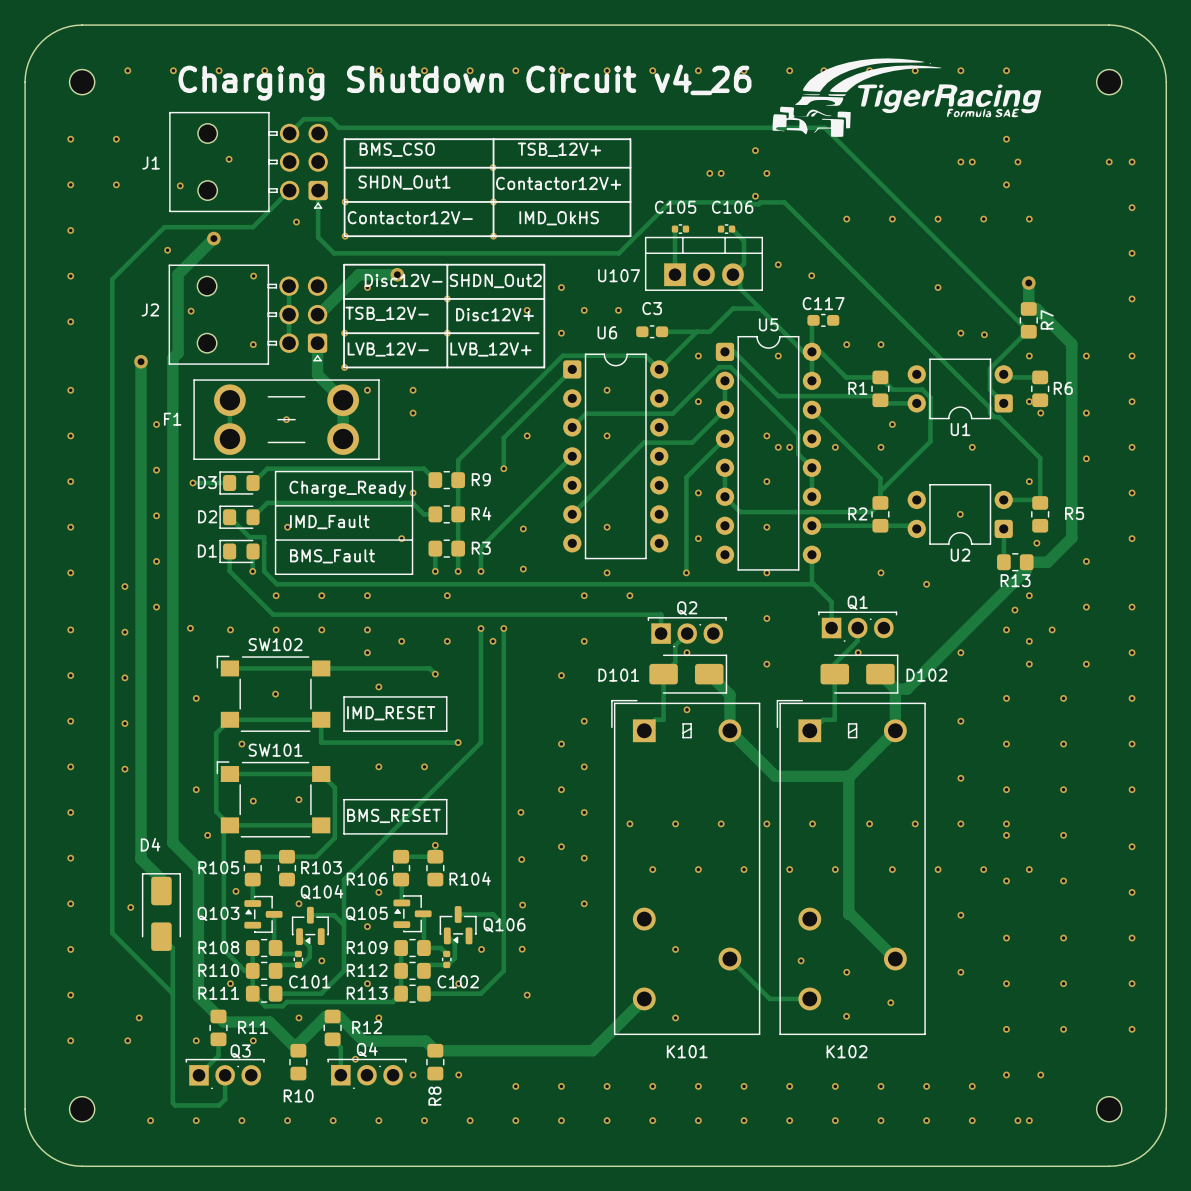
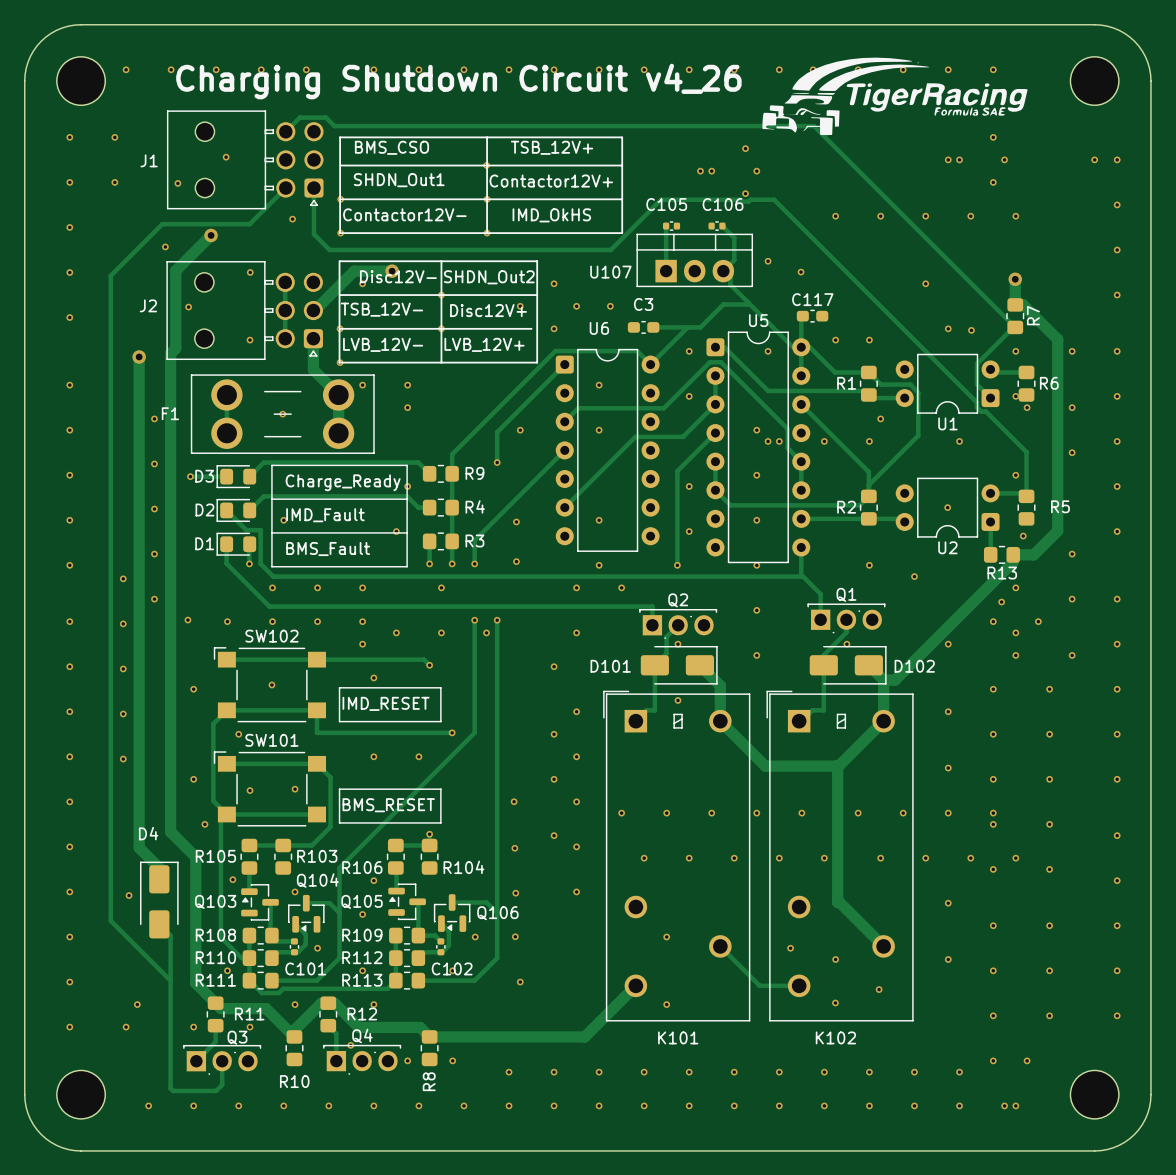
part footprint: [69, 69, 95, 95] -> [56, 56, 106, 106]
part footprint: [1096, 69, 1122, 95] -> [1070, 56, 1119, 106]
part footprint: [69, 1096, 95, 1122] -> [56, 1070, 106, 1119]
part footprint: [1096, 1096, 1122, 1122] -> [1070, 1070, 1119, 1119]

